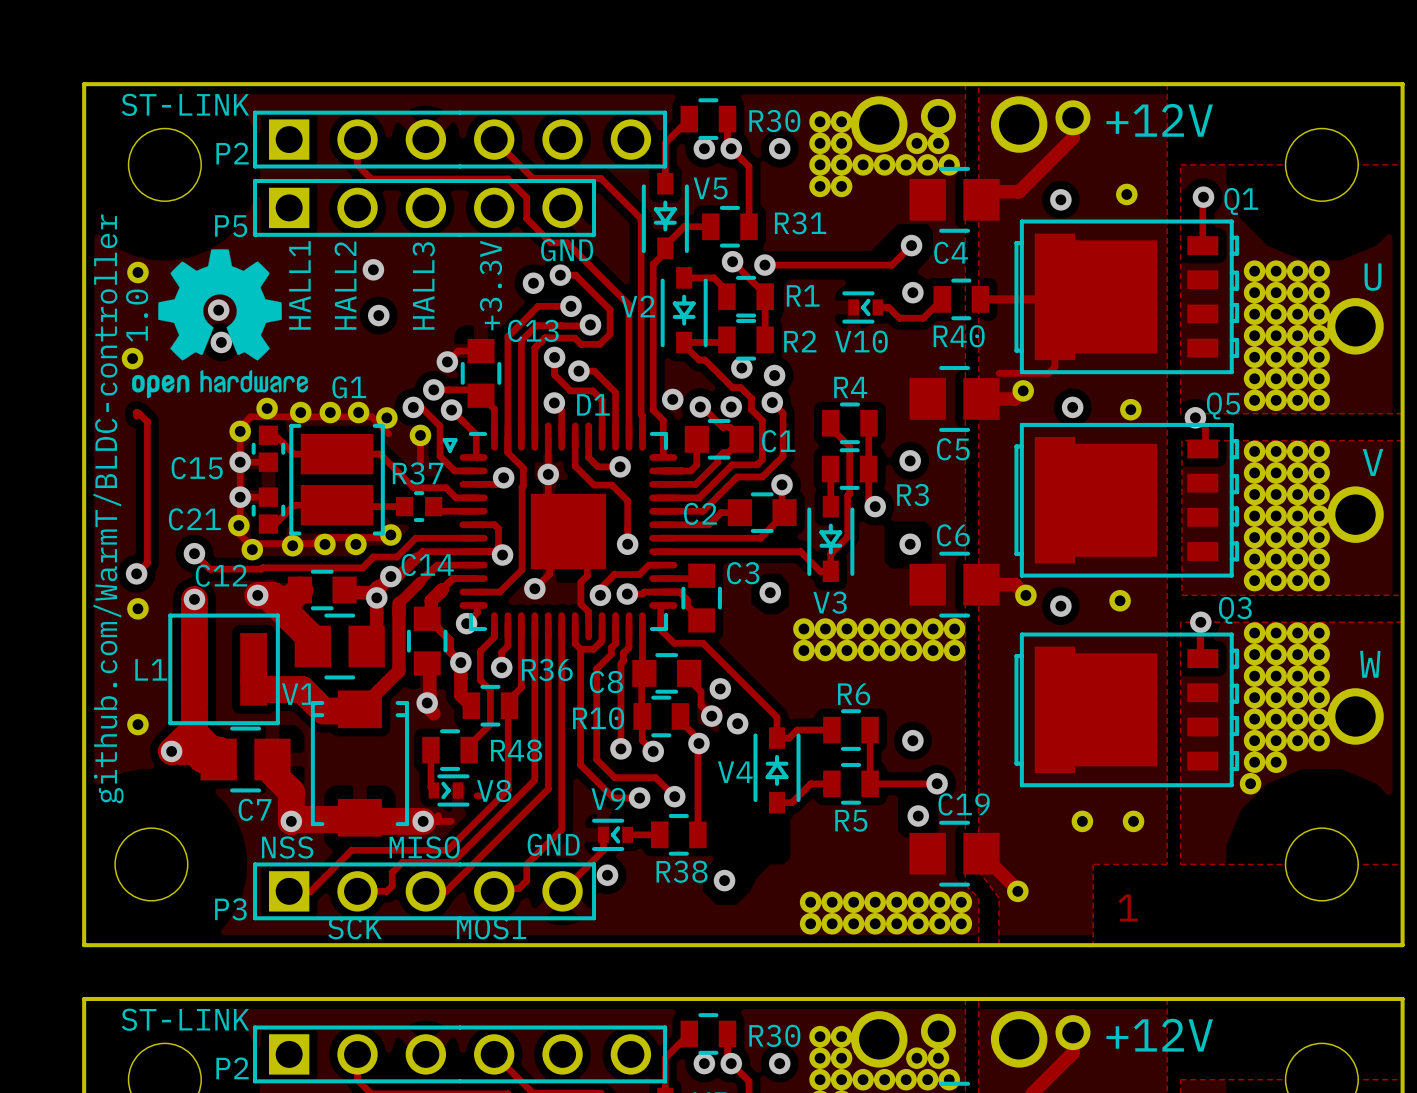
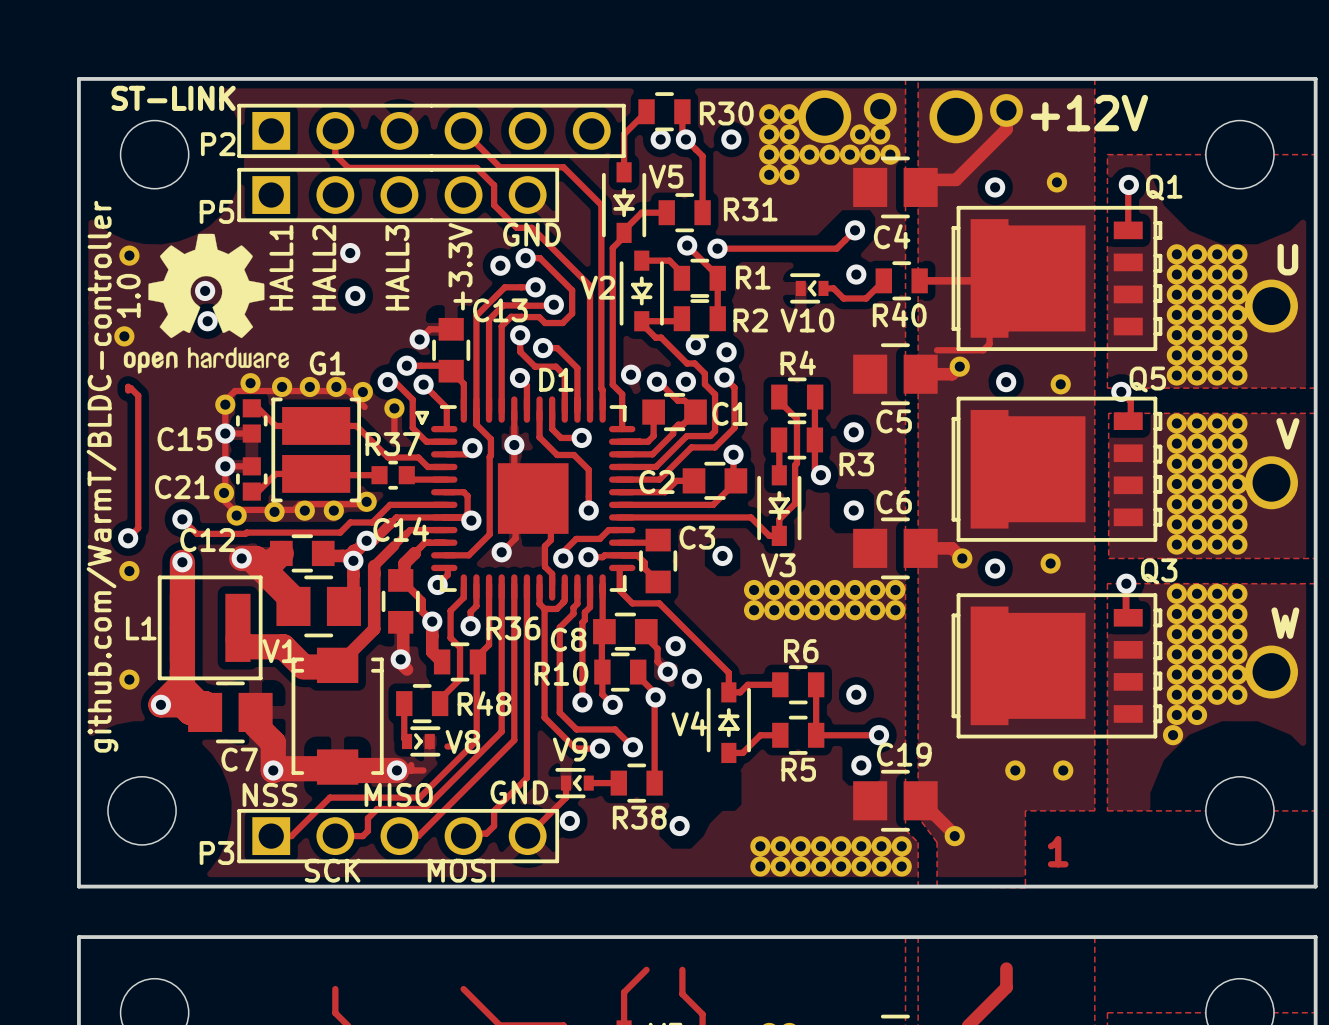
text: ST-LINK (185, 1019) -> none
part: (938, 1031) -> none
part: (1072, 1032) -> none
R30: (708, 1033) -> none
text: +12V (1159, 1035) -> none
part: (820, 1036) -> none
part: (841, 1036) -> none
part: (879, 1039) -> none
part: (1019, 1039) -> none
P2: (460, 1054) -> none
part: (820, 1058) -> none
part: (841, 1058) -> none
part: (916, 1058) -> none
part: (938, 1058) -> none
via: (704, 1063) -> none
via: (731, 1063) -> none
via: (779, 1063) -> none
part: (820, 1079) -> none
part: (841, 1079) -> none
part: (863, 1079) -> none
part: (884, 1079) -> none
part: (906, 1079) -> none
part: (927, 1079) -> none
part: (949, 1079) -> none

